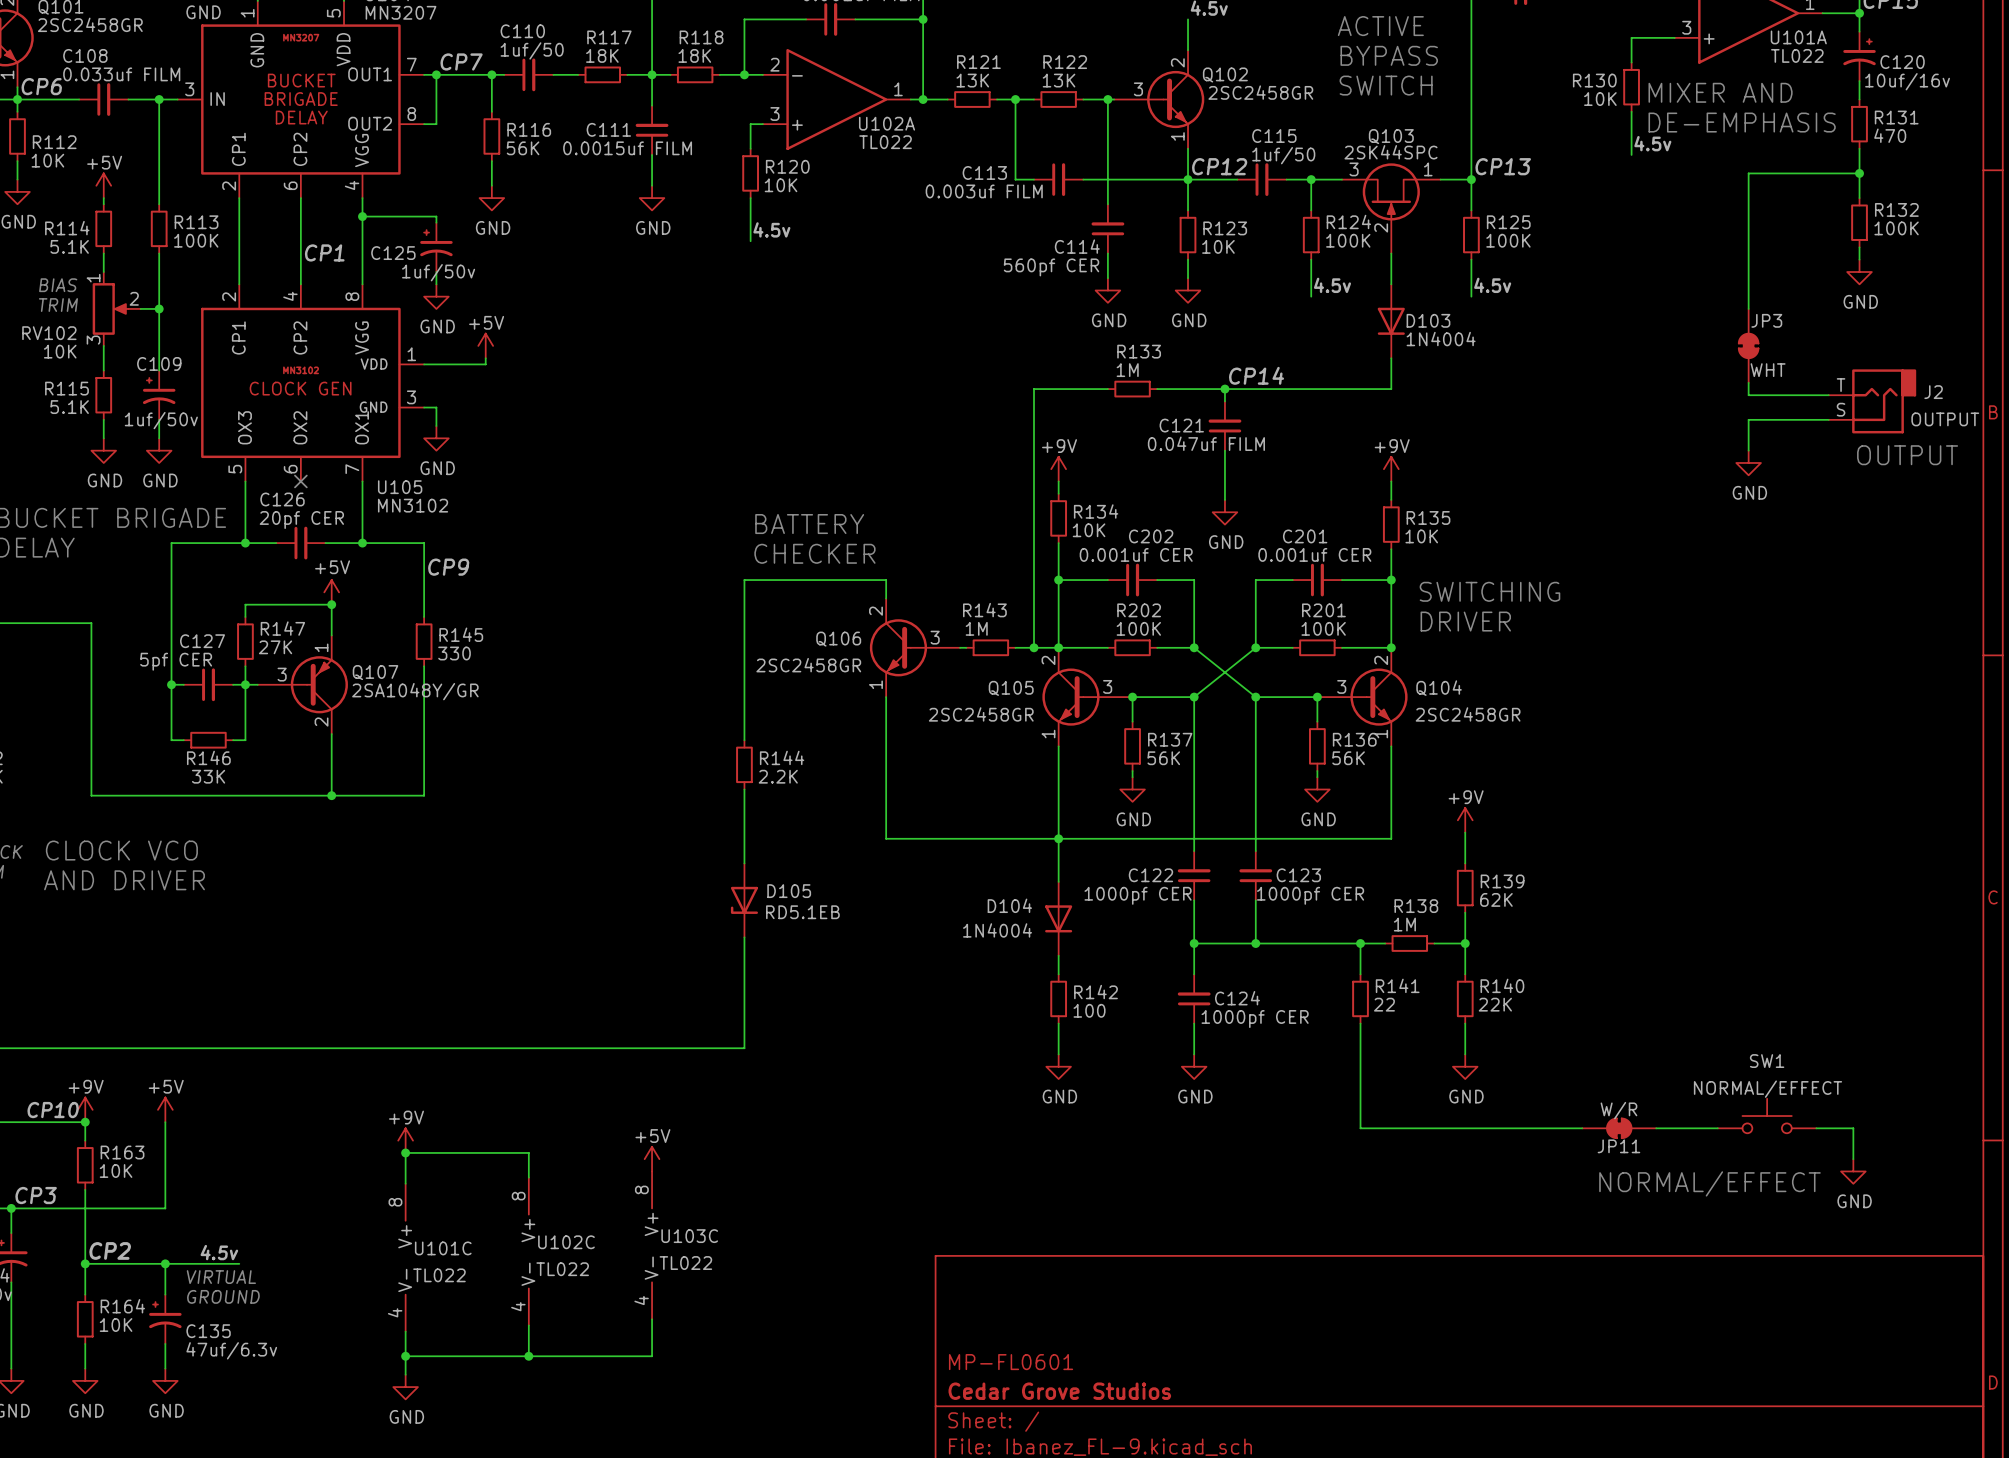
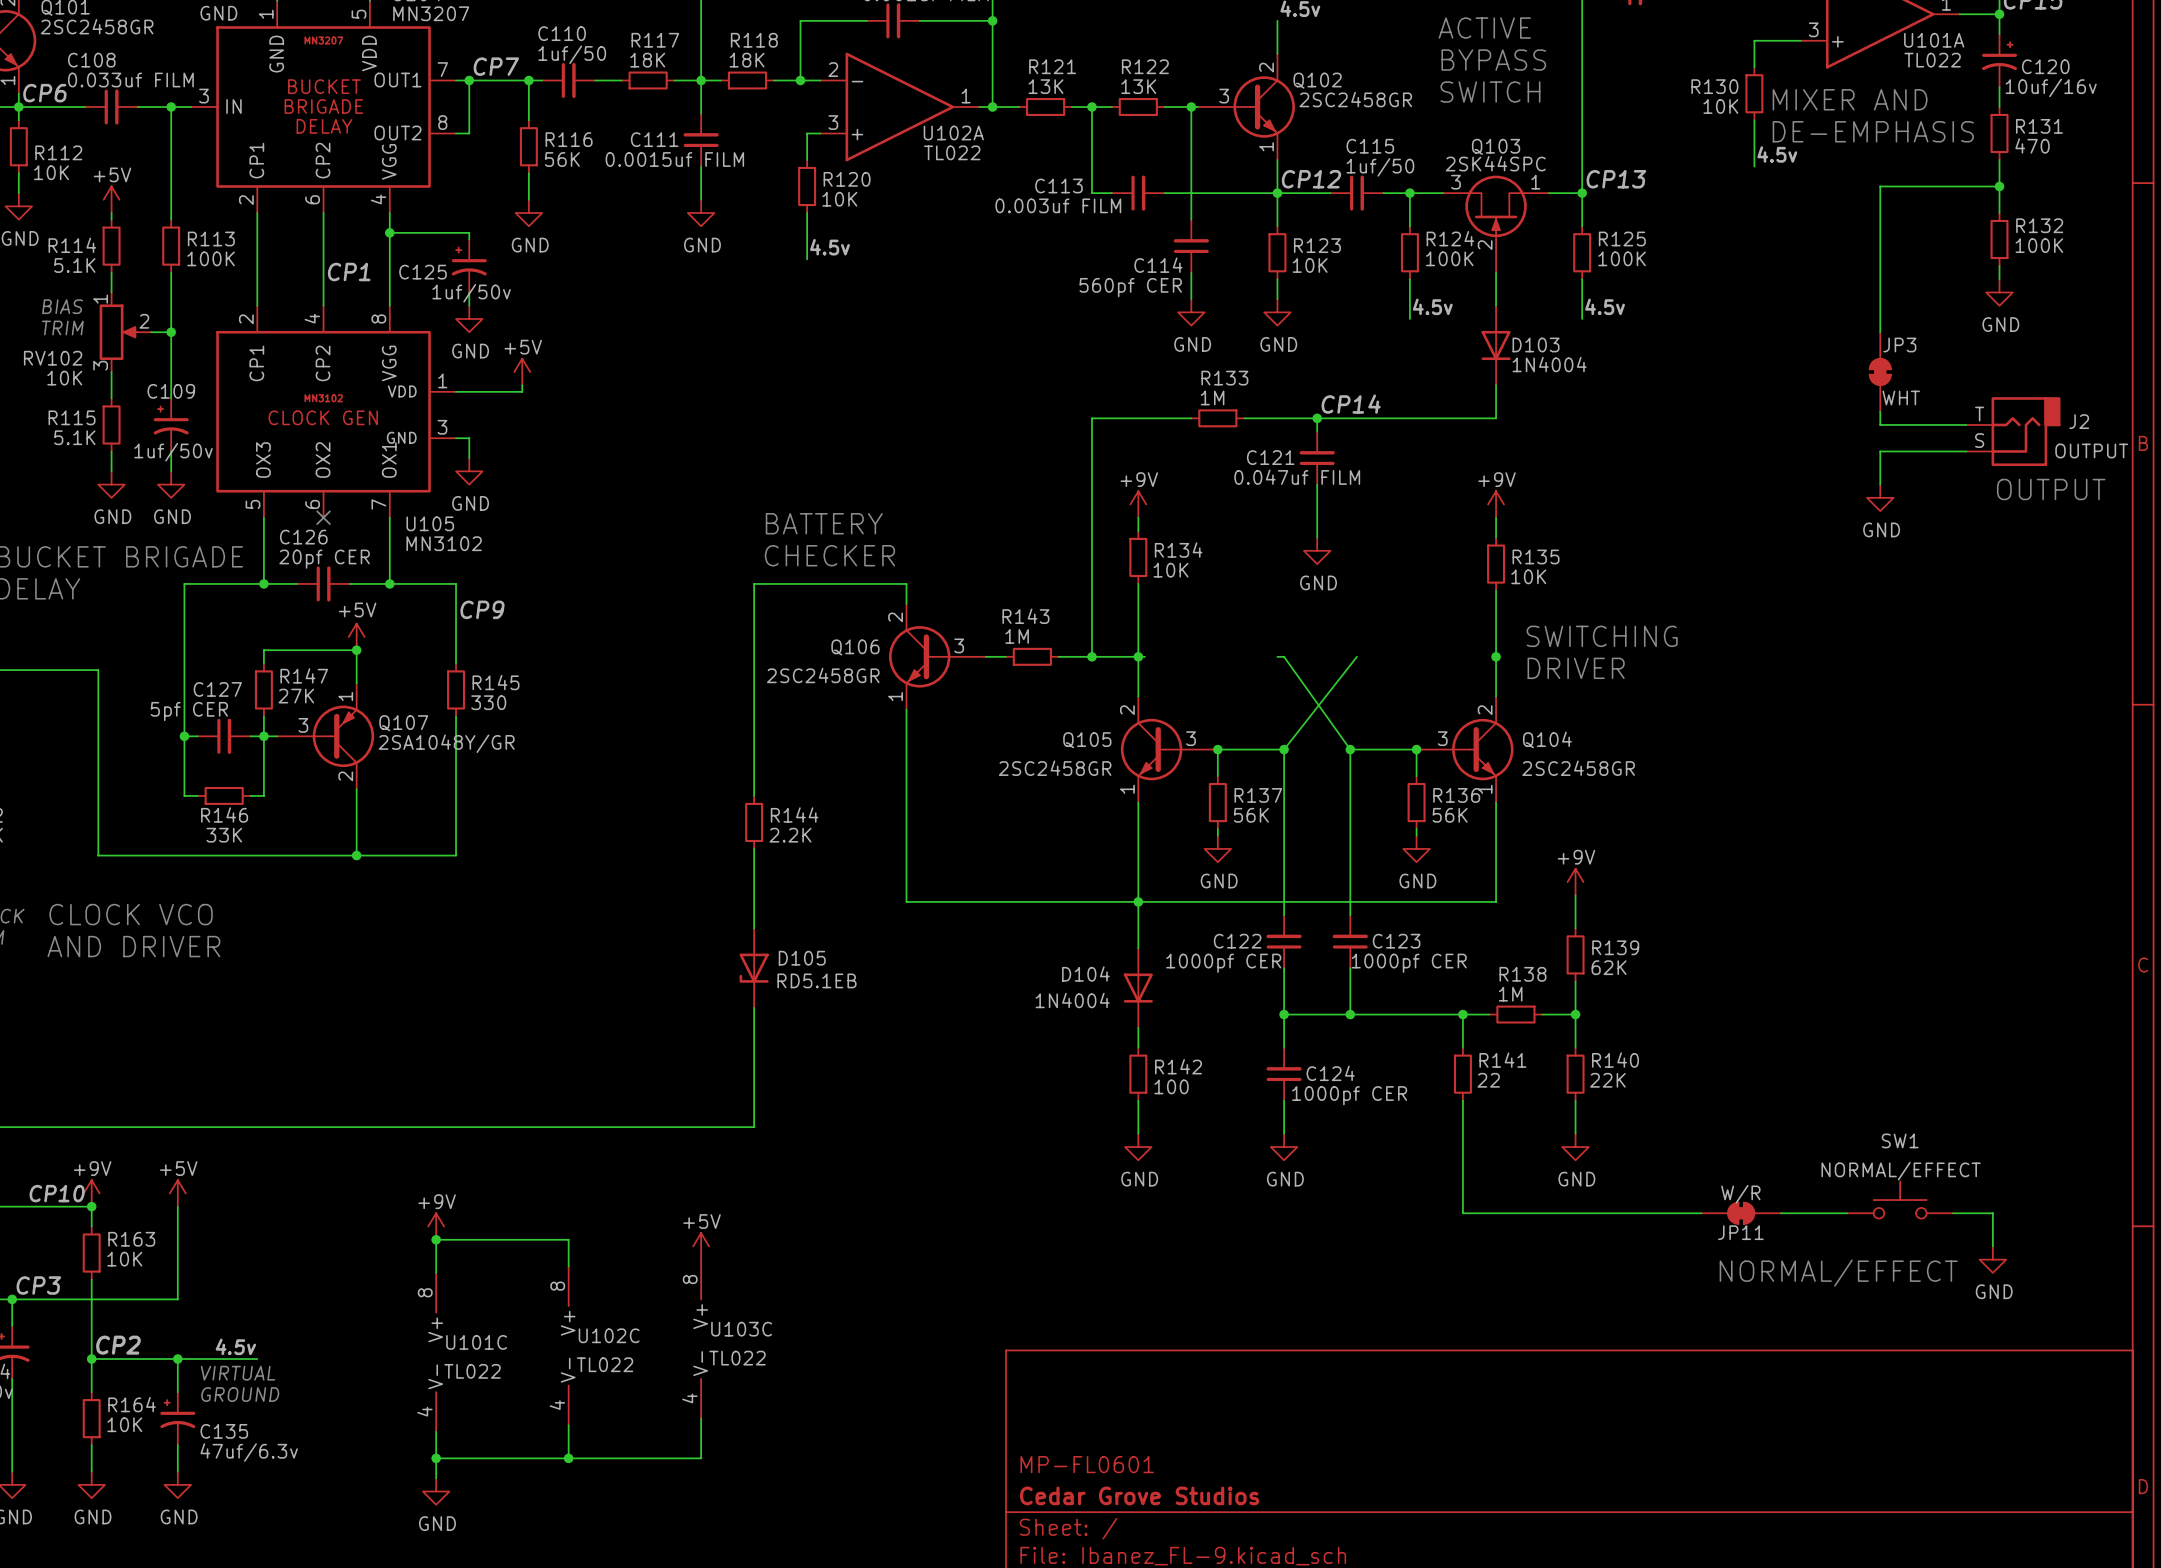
wire: (1034, 389) (1034, 647) -> (1111, 418) (1091, 418) (1091, 656)
text position: BATTERY (809, 524) -> BATTERY (824, 523)
text position: CHECKER (814, 553) -> CHECKER (829, 555)
wire: none -> (906, 603) (906, 583) (754, 583) (754, 795)
wire: (1058, 580) (1107, 580) -> none
junction: (1058, 580) -> none
C202: 0.001uf CER (1132, 580) -> none
wire: (1157, 580) (1194, 580) (1194, 647) -> none
wire: (1292, 580) (1255, 580) (1255, 647) -> none
C201: 0.001uf CER (1317, 580) -> none
wire: (1342, 580) (1391, 580) -> none
junction: (1391, 580) -> none
wire: (886, 598) (886, 580) (744, 580) (744, 740) -> none
wire: none -> (985, 656) (1005, 656)
wire: none -> (1058, 656) (1144, 656)
junction: none -> (1091, 656)
junction: none -> (1138, 656)
junction: none -> (1496, 656)
Q106 position: (914, 647) -> (937, 656)
wire: (960, 647) (966, 647) -> none
R143 position: (990, 647) -> (1032, 656)
wire: (1015, 647) (1107, 647) -> none
junction: (1034, 647) -> none
junction: (1058, 647) -> none
R202: 100K (1132, 647) -> none
wire: (1157, 647) (1194, 647) -> none
wire: (1194, 647) (1255, 697) -> (1277, 656) (1284, 656) (1350, 749)
junction: (1194, 647) -> none
wire: (1255, 647) (1194, 697) -> (1356, 656) (1284, 749)
wire: (1255, 647) (1292, 647) -> none
junction: (1255, 647) -> none
R201: 100K (1317, 647) -> none
wire: (1342, 647) (1391, 647) -> none
junction: (1391, 647) -> none
wire: (886, 697) (886, 838) -> (906, 709) (906, 901) (952, 901)
R144 position: (744, 764) -> (754, 822)
wire: (744, 789) (744, 863) -> (754, 848) (754, 928)
D105 position: (744, 900) -> (754, 968)
wire: (744, 937) (744, 1048) (701, 1048) -> (754, 1007) (754, 1127)

